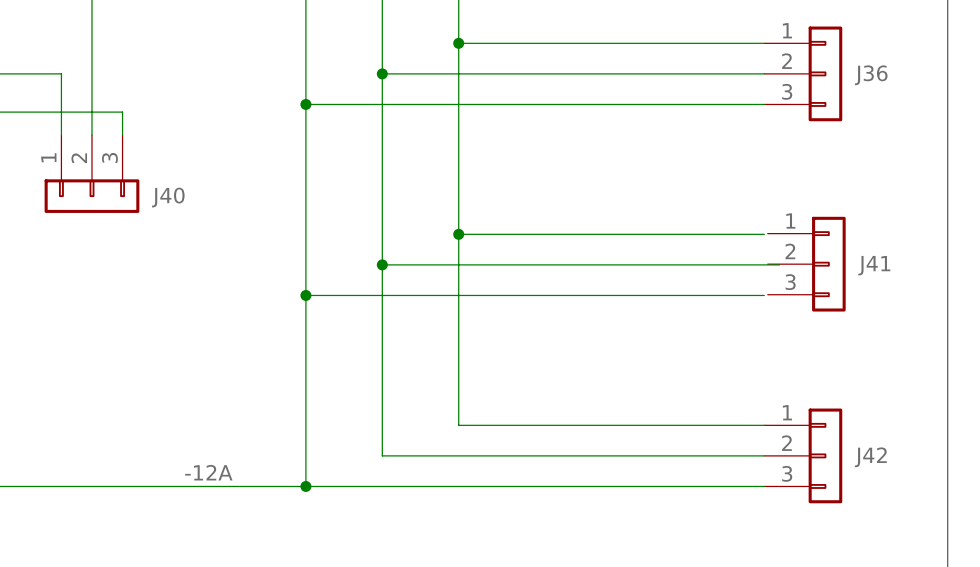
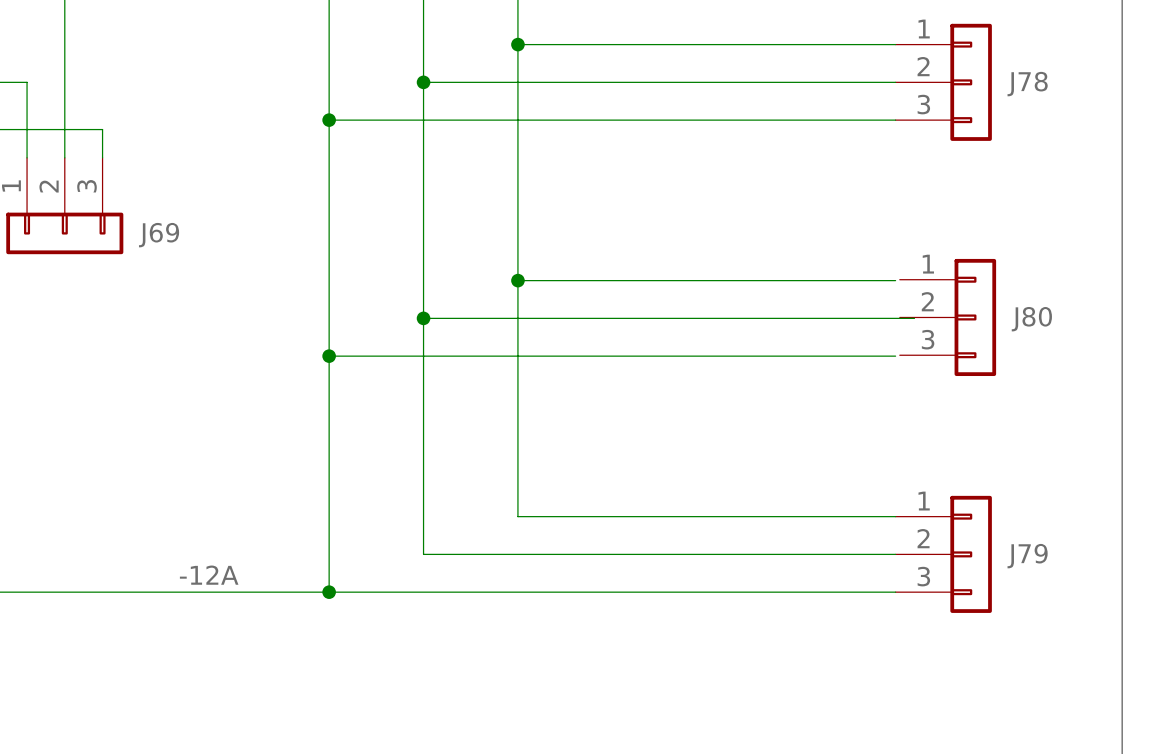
J36 name: J36 (871, 75) -> J78 (1027, 84)
J40 name: J40 (168, 197) -> J69 (159, 235)
J41 name: J41 (874, 265) -> J80 (1031, 319)
J42 name: J42 (870, 457) -> J79 (1027, 556)

